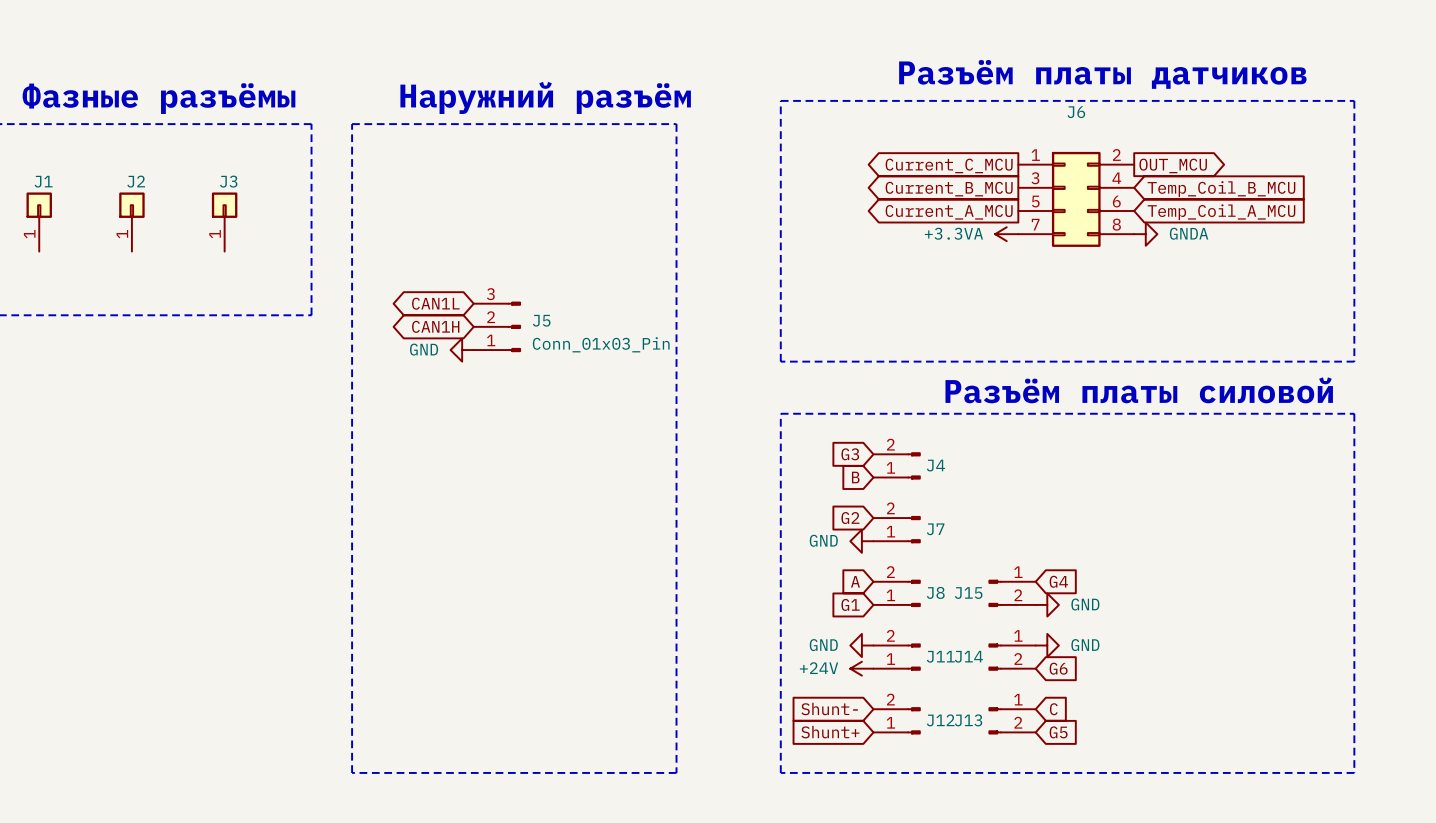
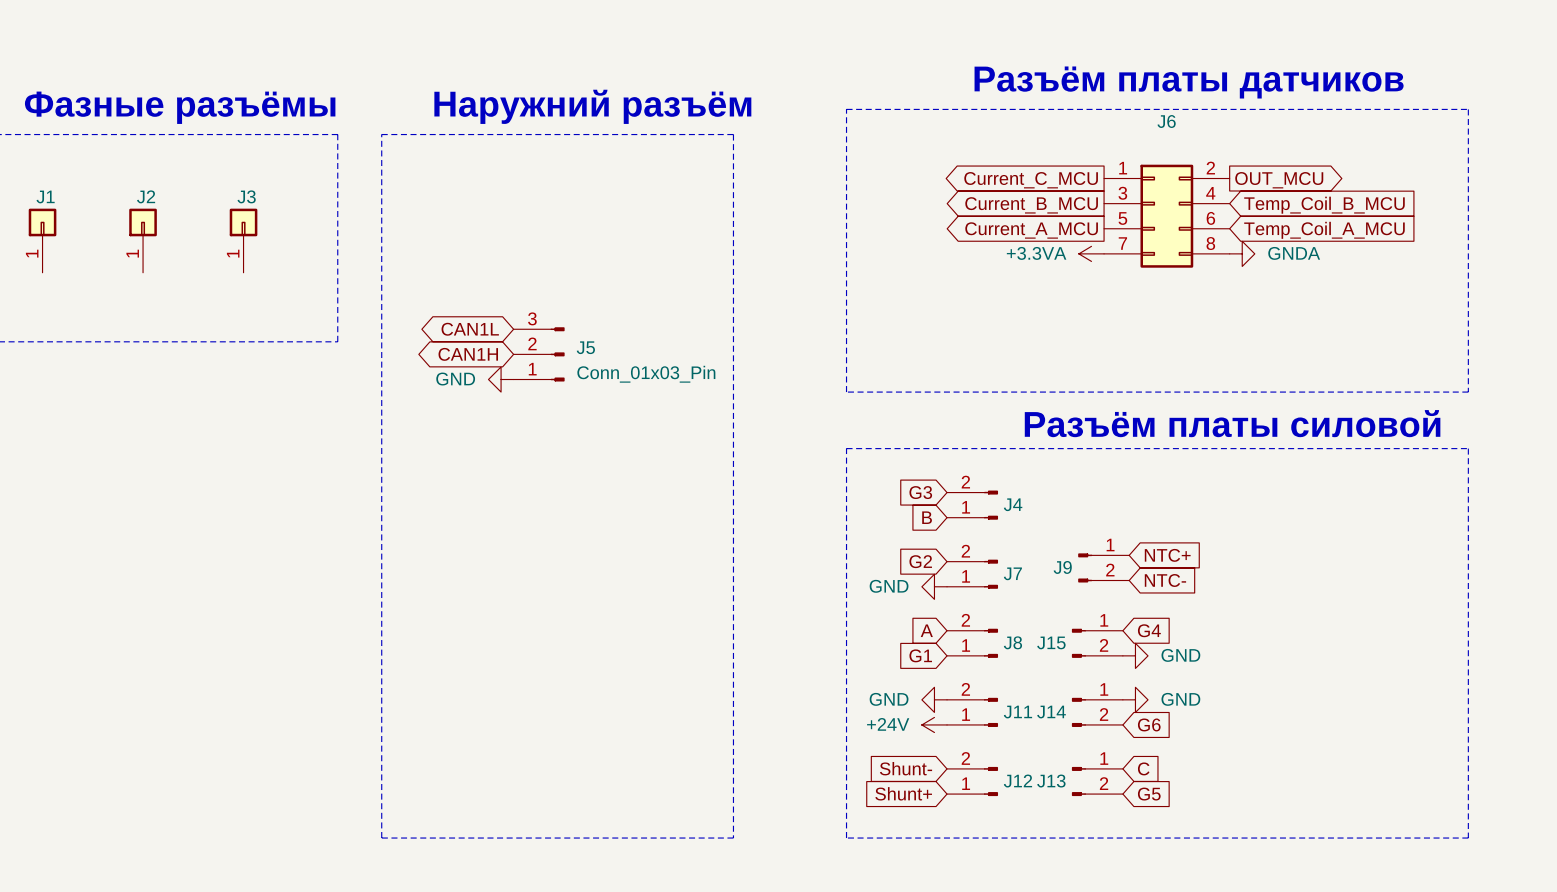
global label: none -> NTC+ (1167, 555)
J9: none -> (1103, 567)
global label: none -> NTC- (1165, 580)

